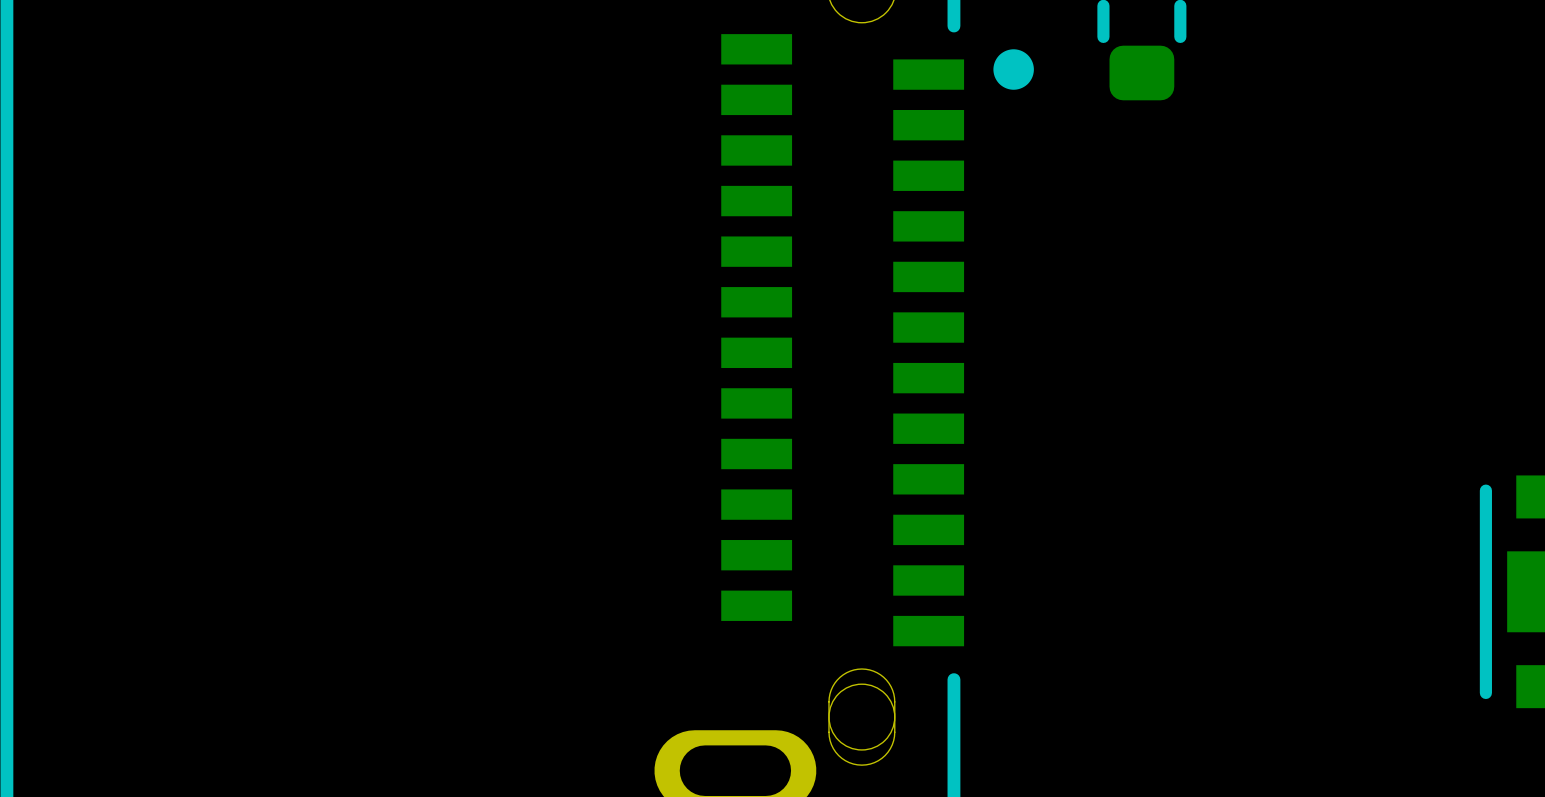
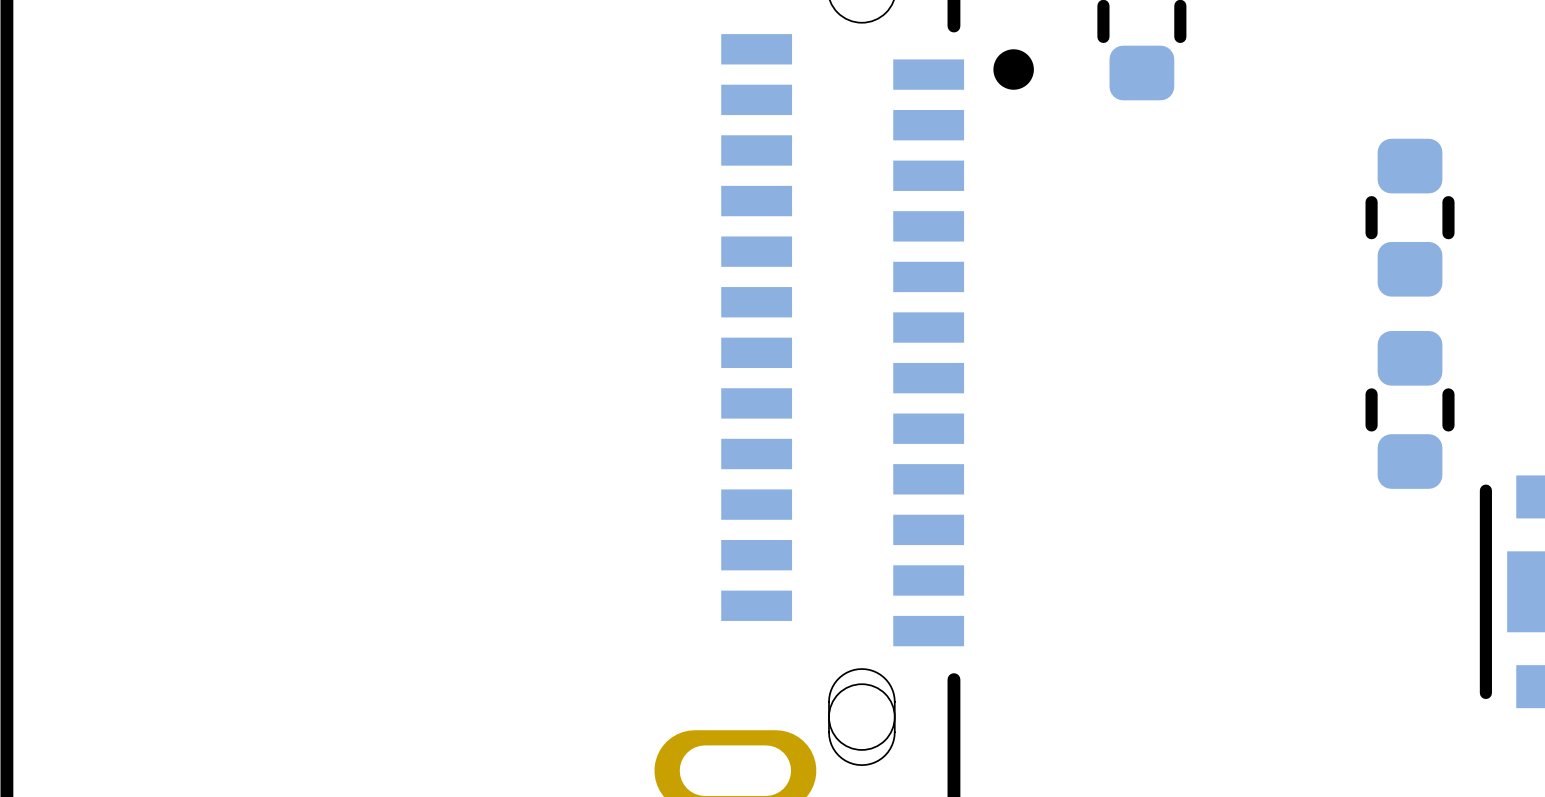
part: none -> (1410, 217)
part: none -> (1410, 409)

